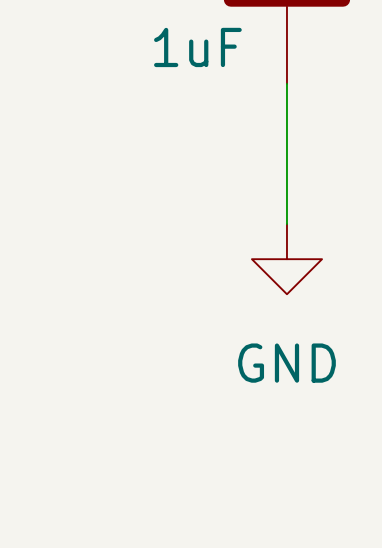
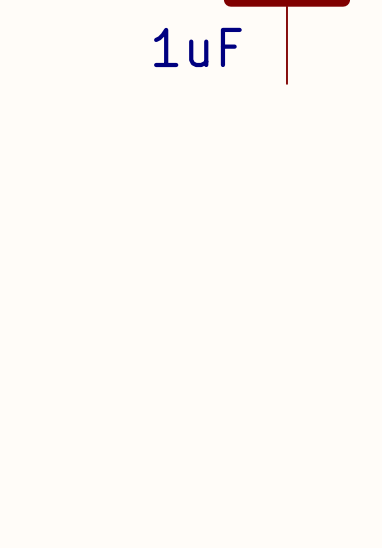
wire: (286, 83) (286, 224) -> none
power symbol: GND (286, 259) -> none

